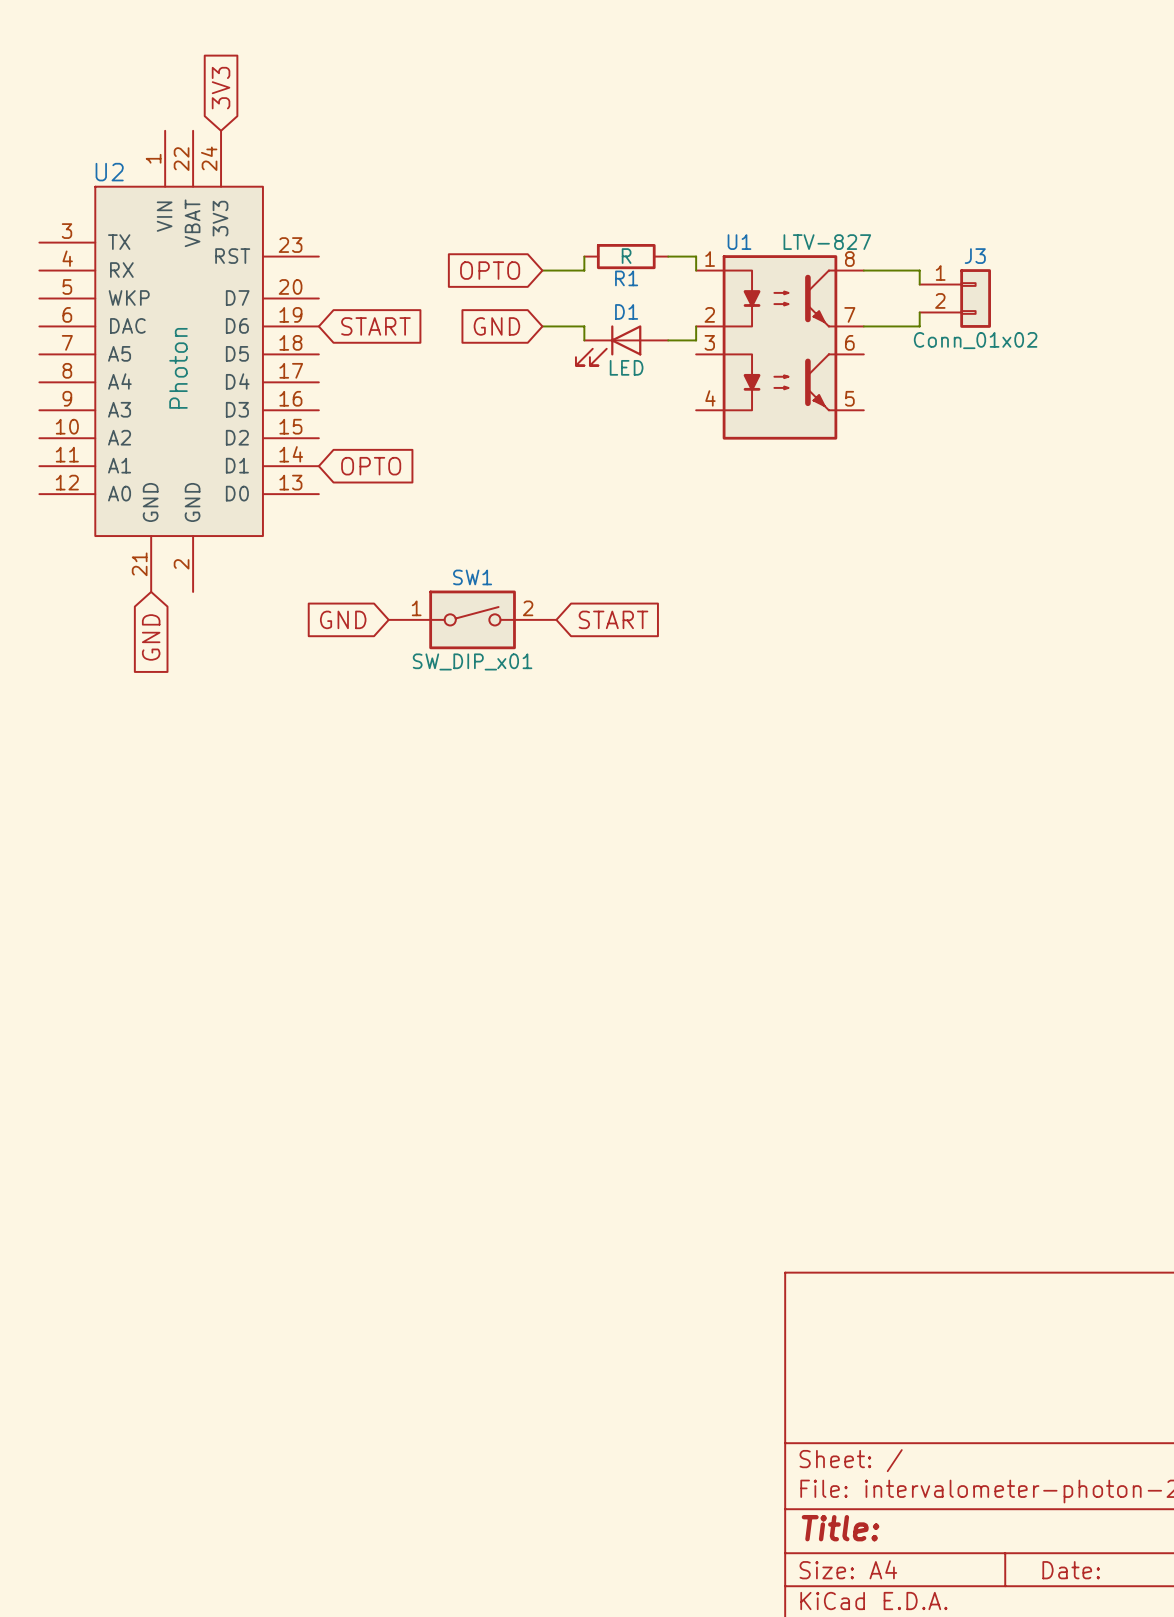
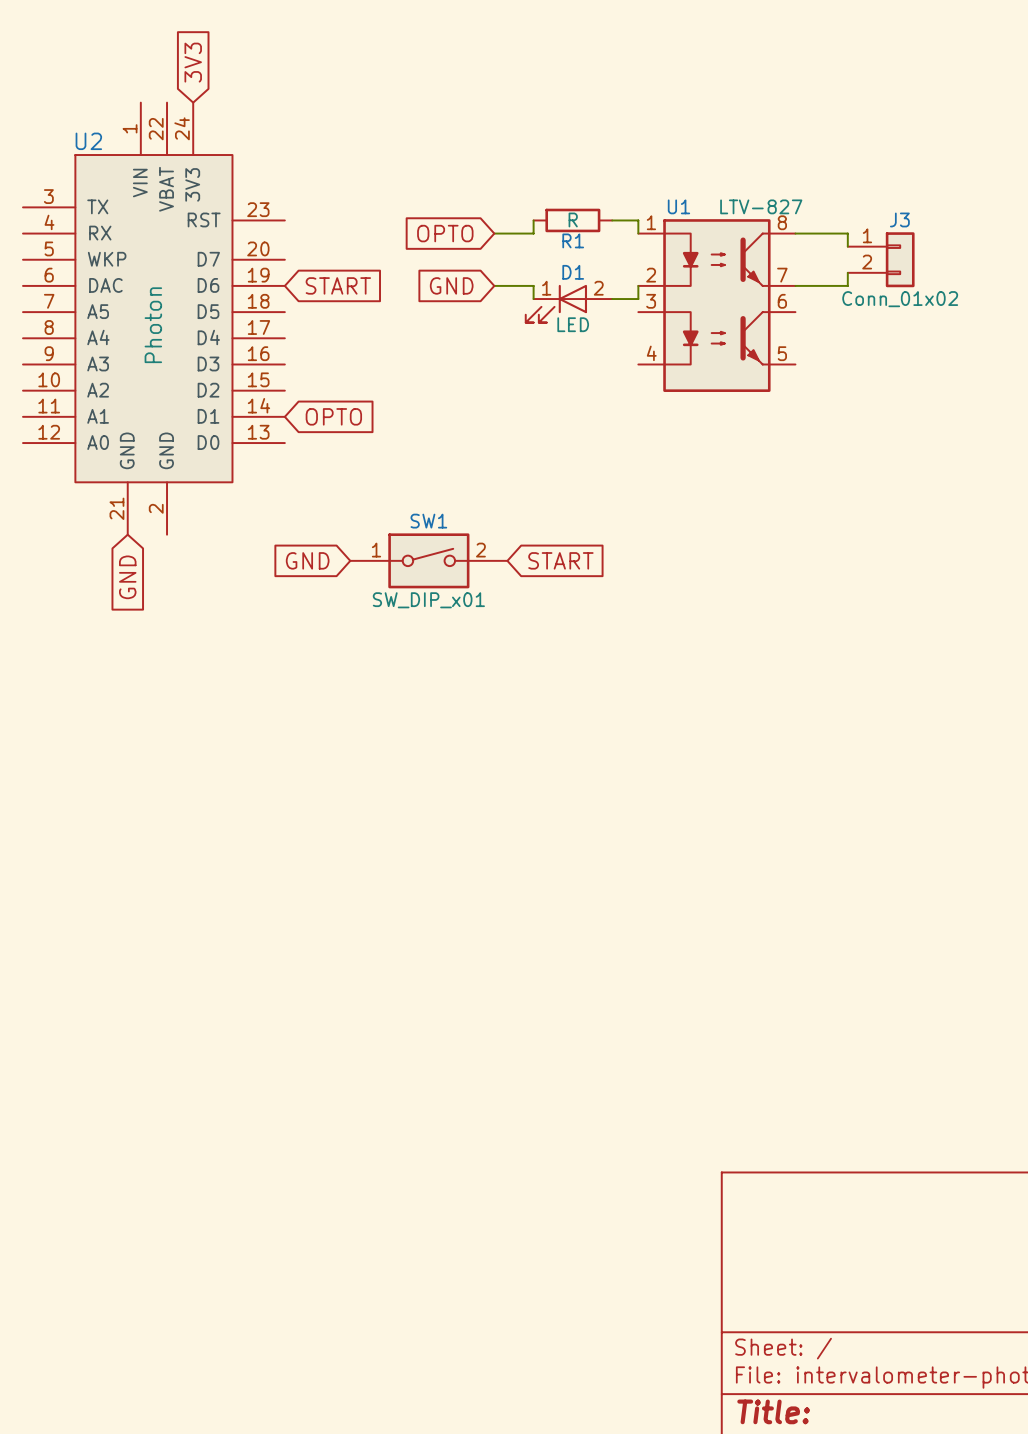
D1 pin number: none -> 1 (546, 288)
D1 pin number: none -> 2 (598, 288)

